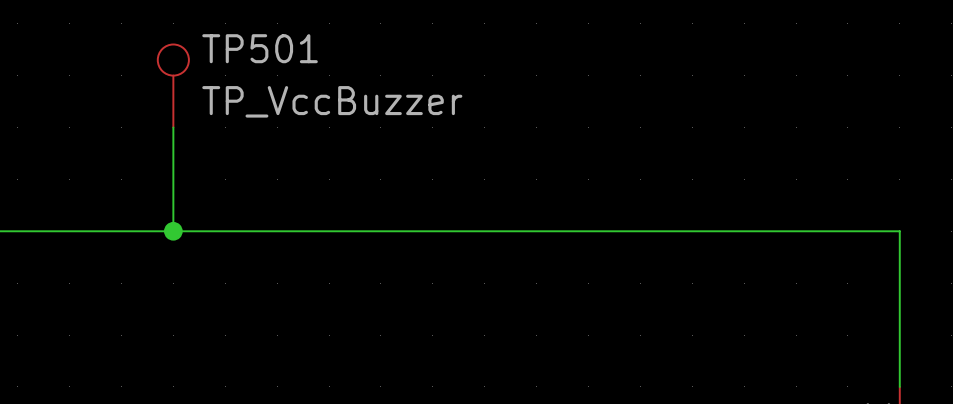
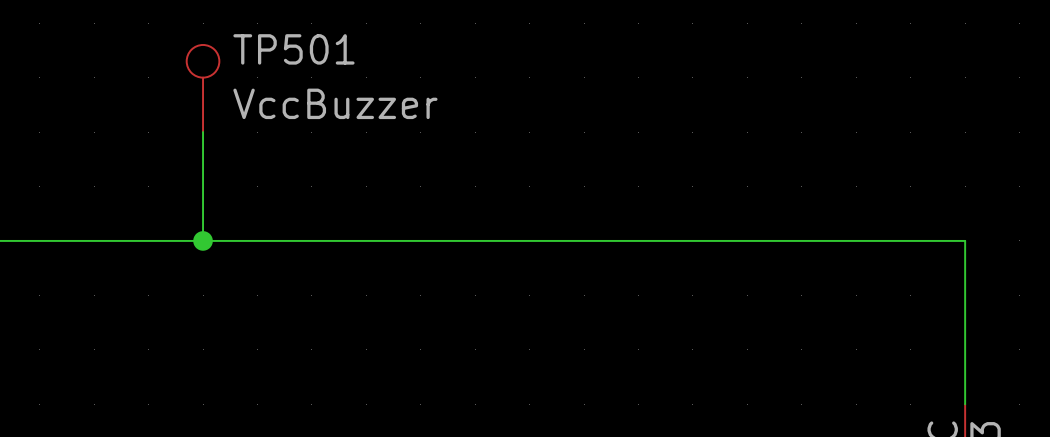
TP501 value: TP_VccBuzzer (332, 101) -> VccBuzzer (335, 103)

